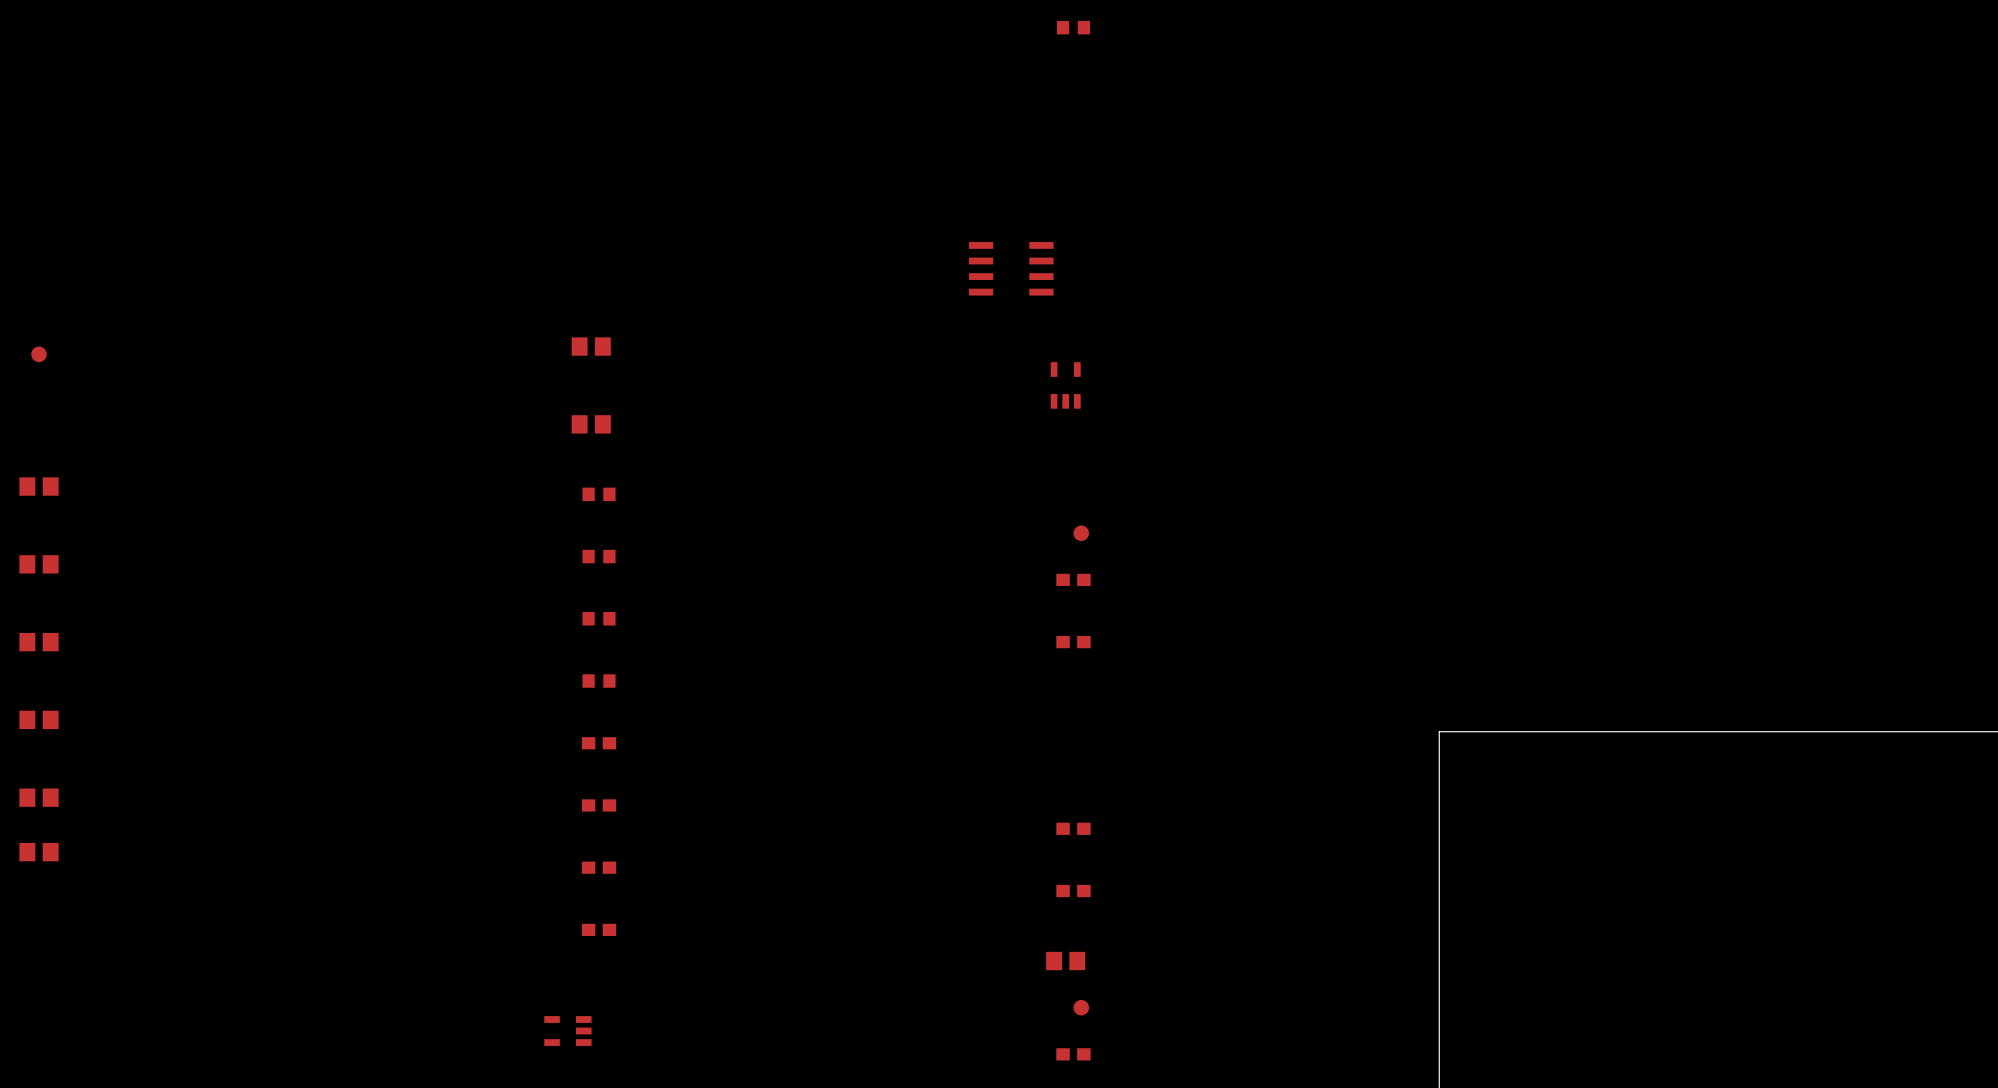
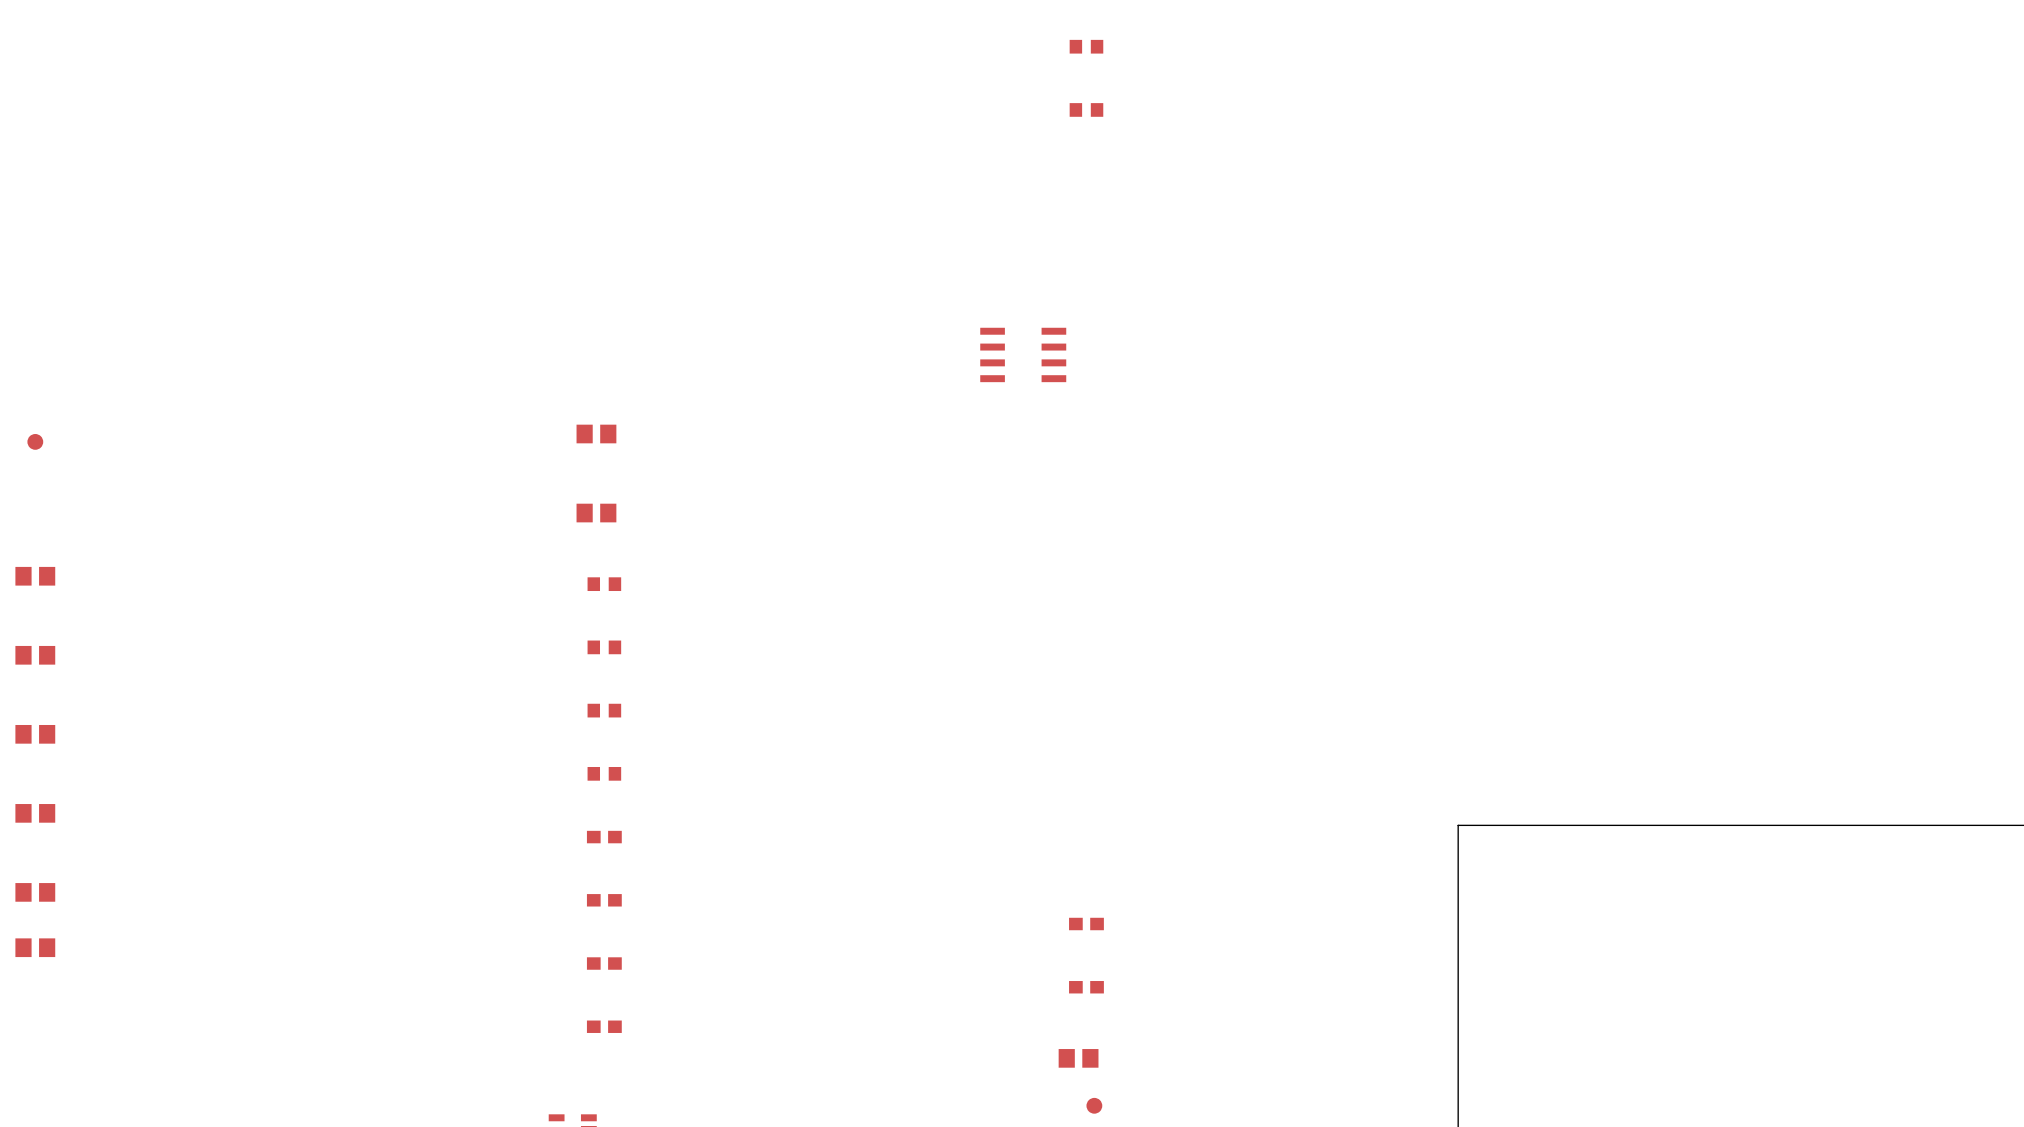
part: (1065, 385) -> none
part: (1081, 533) -> none
part: (1073, 579) -> none
part: (1073, 642) -> none

